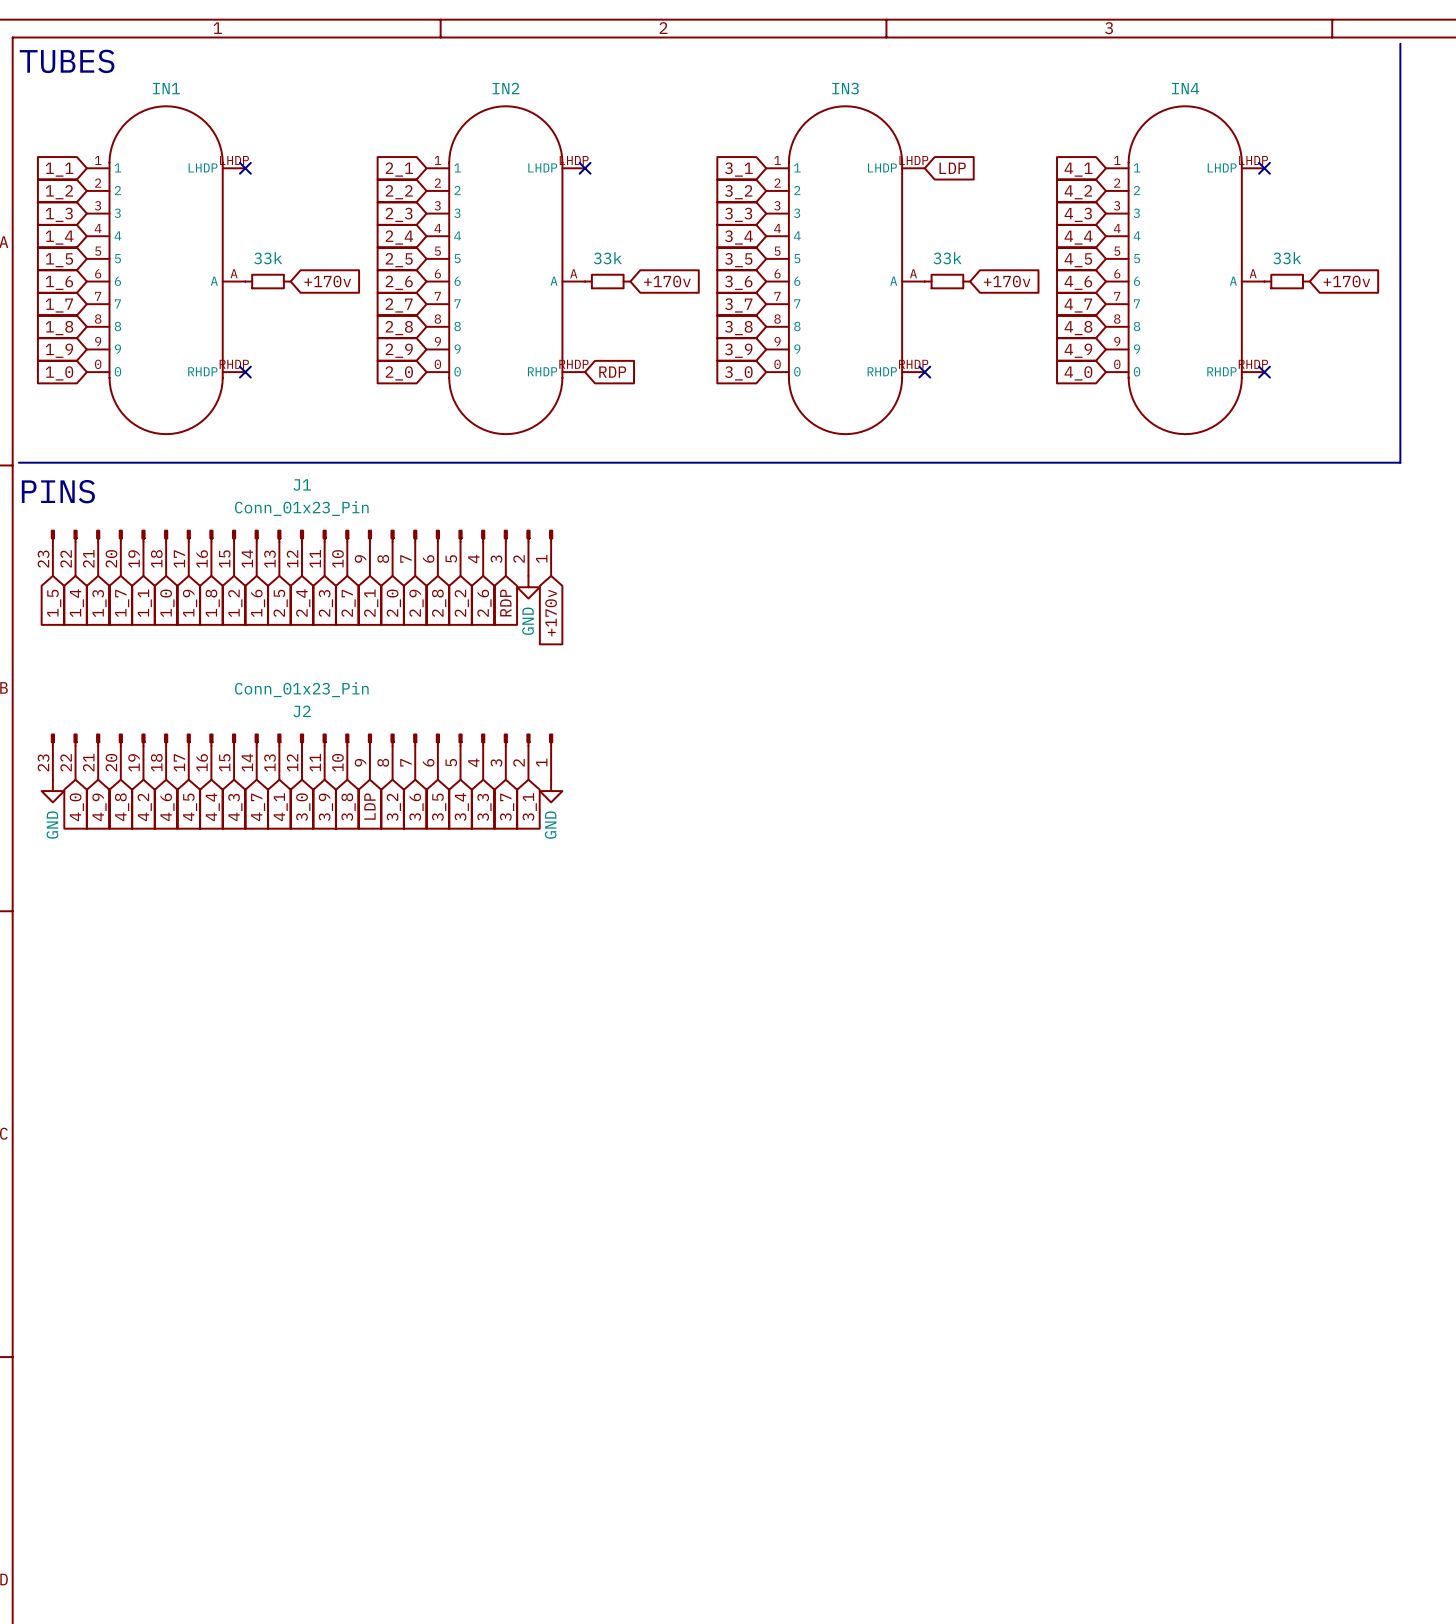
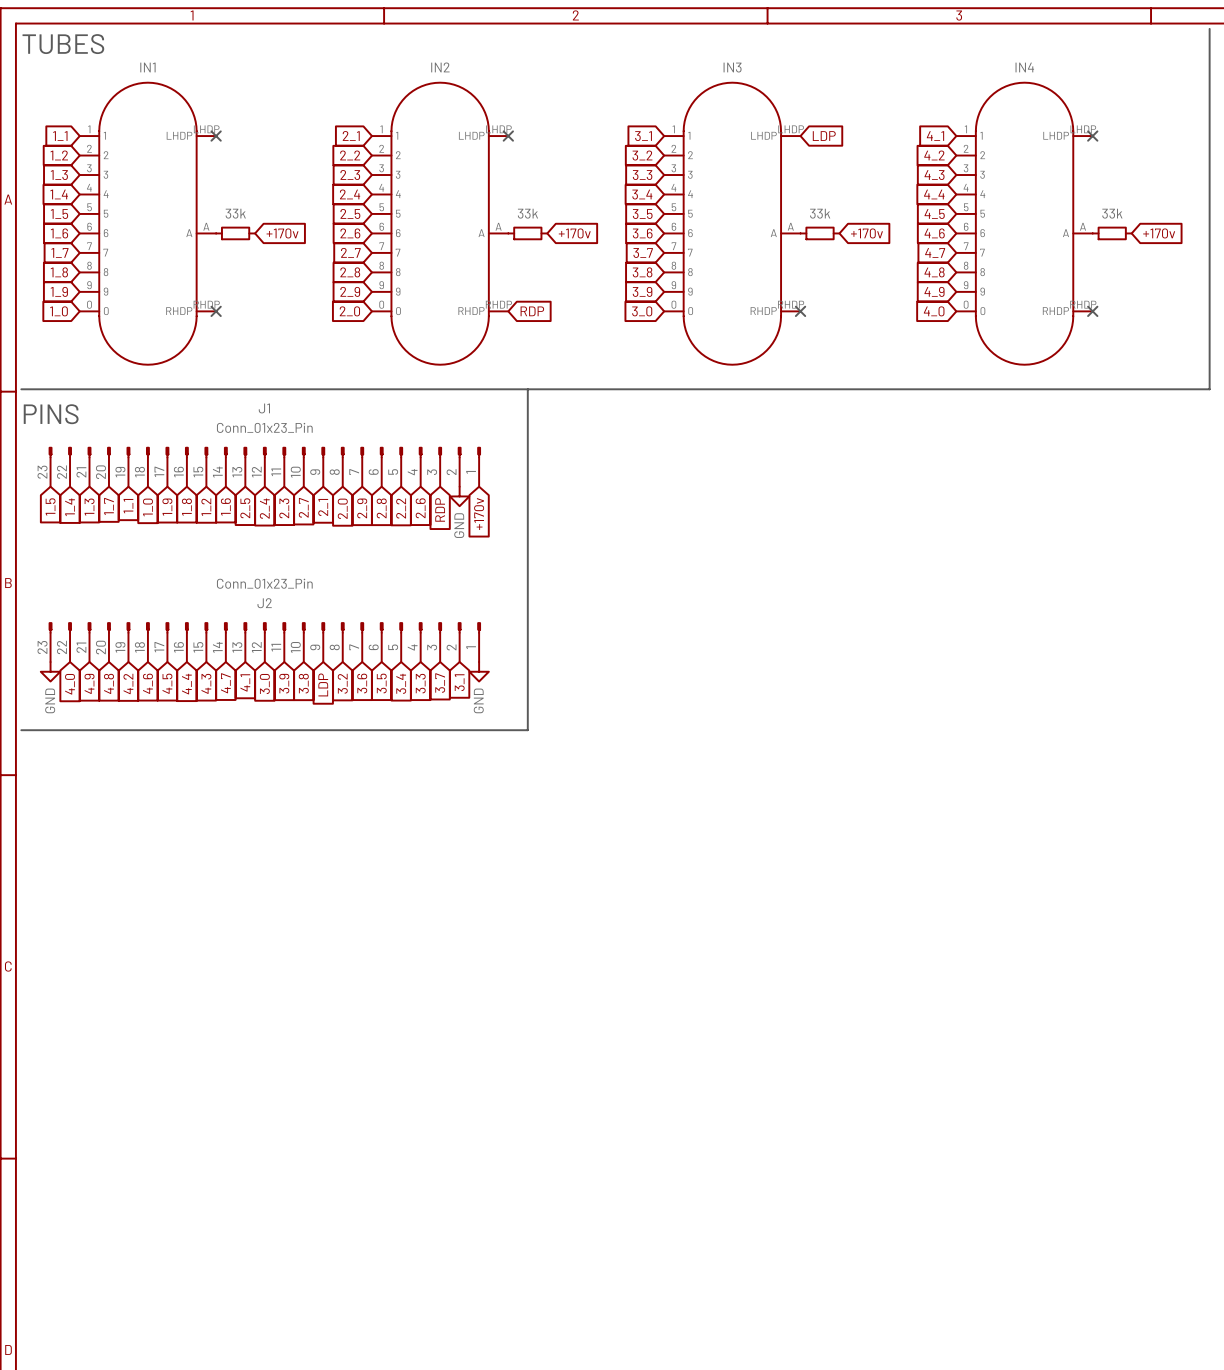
line: none -> (527, 389) (527, 730) (21, 730)

